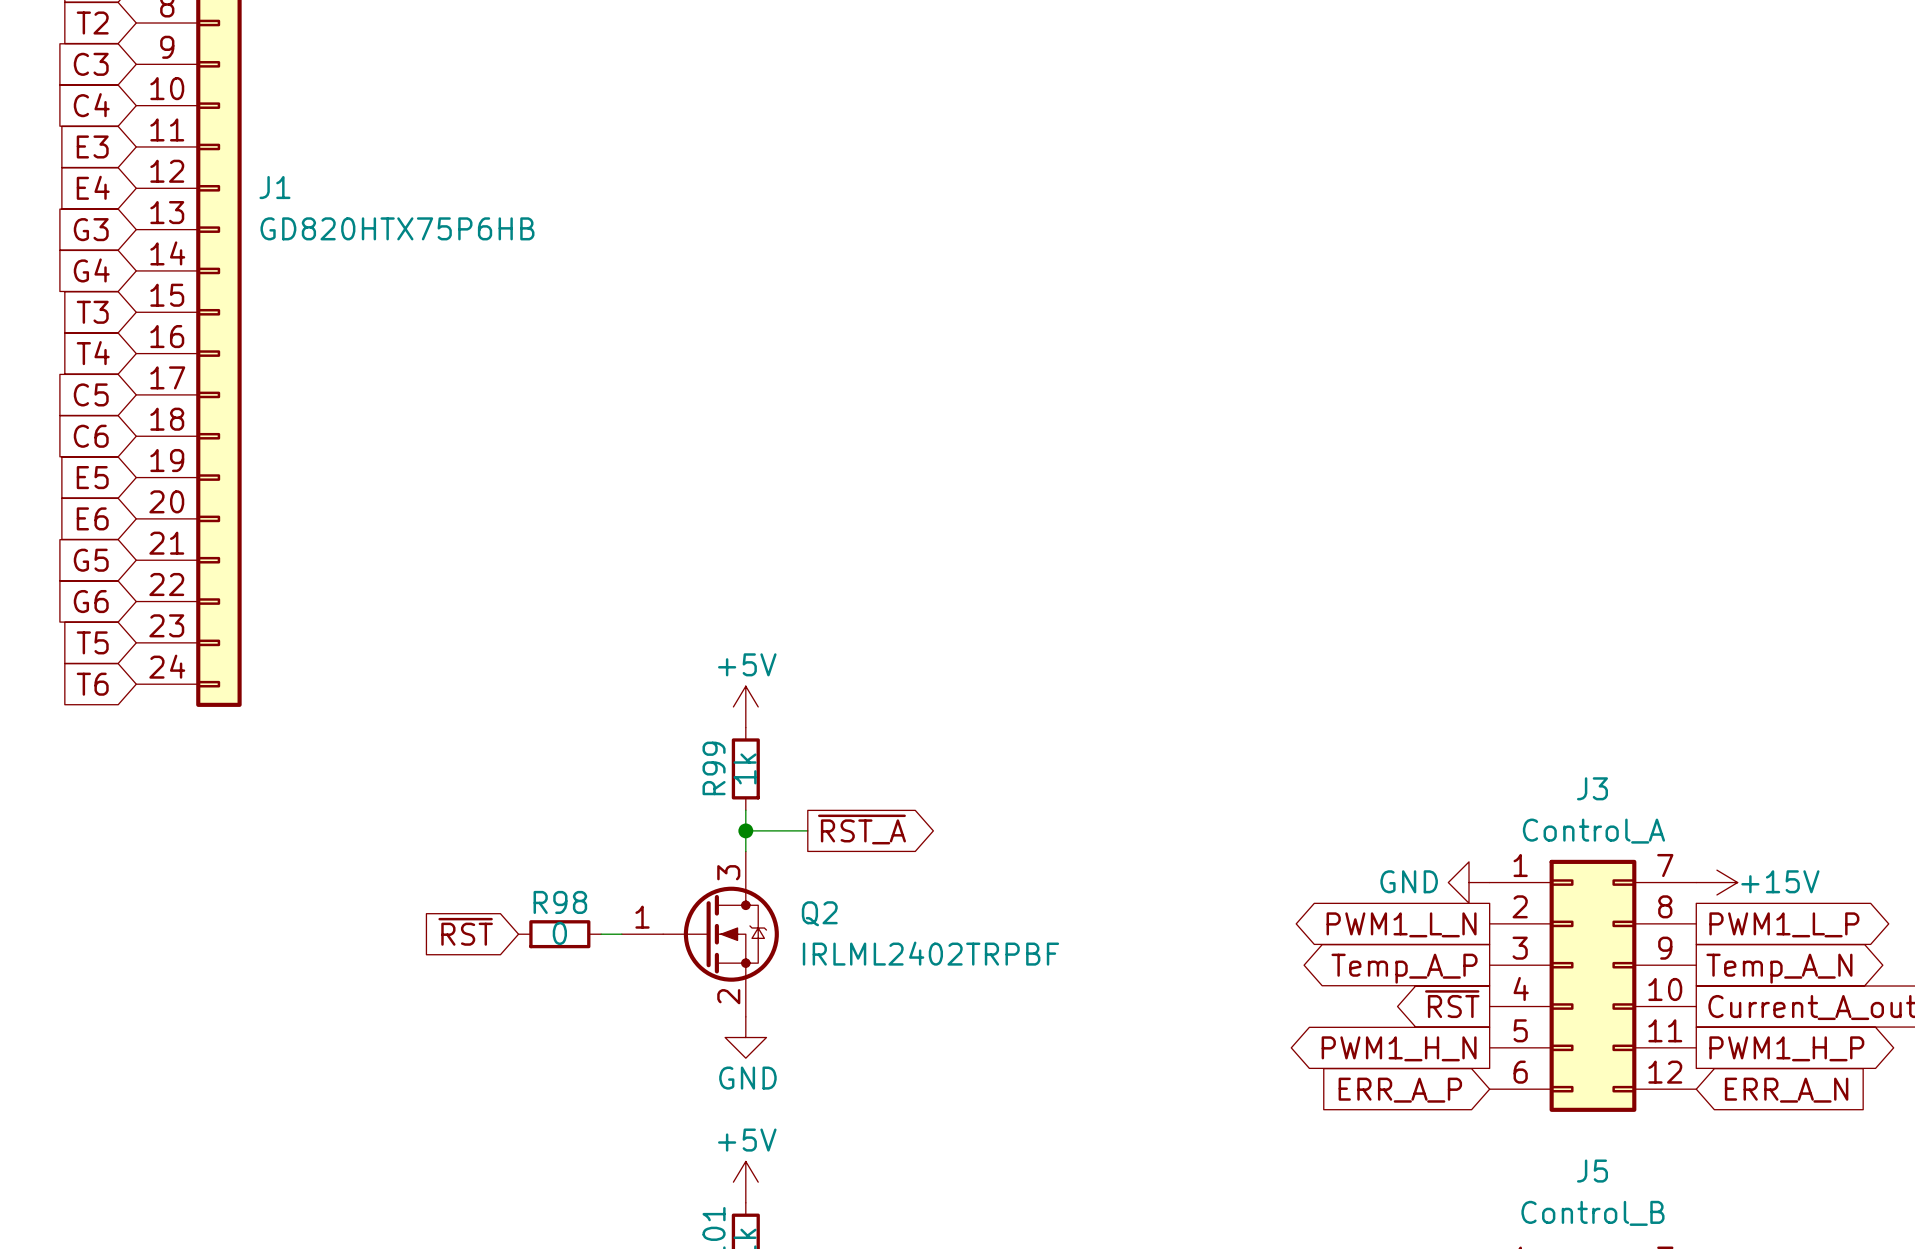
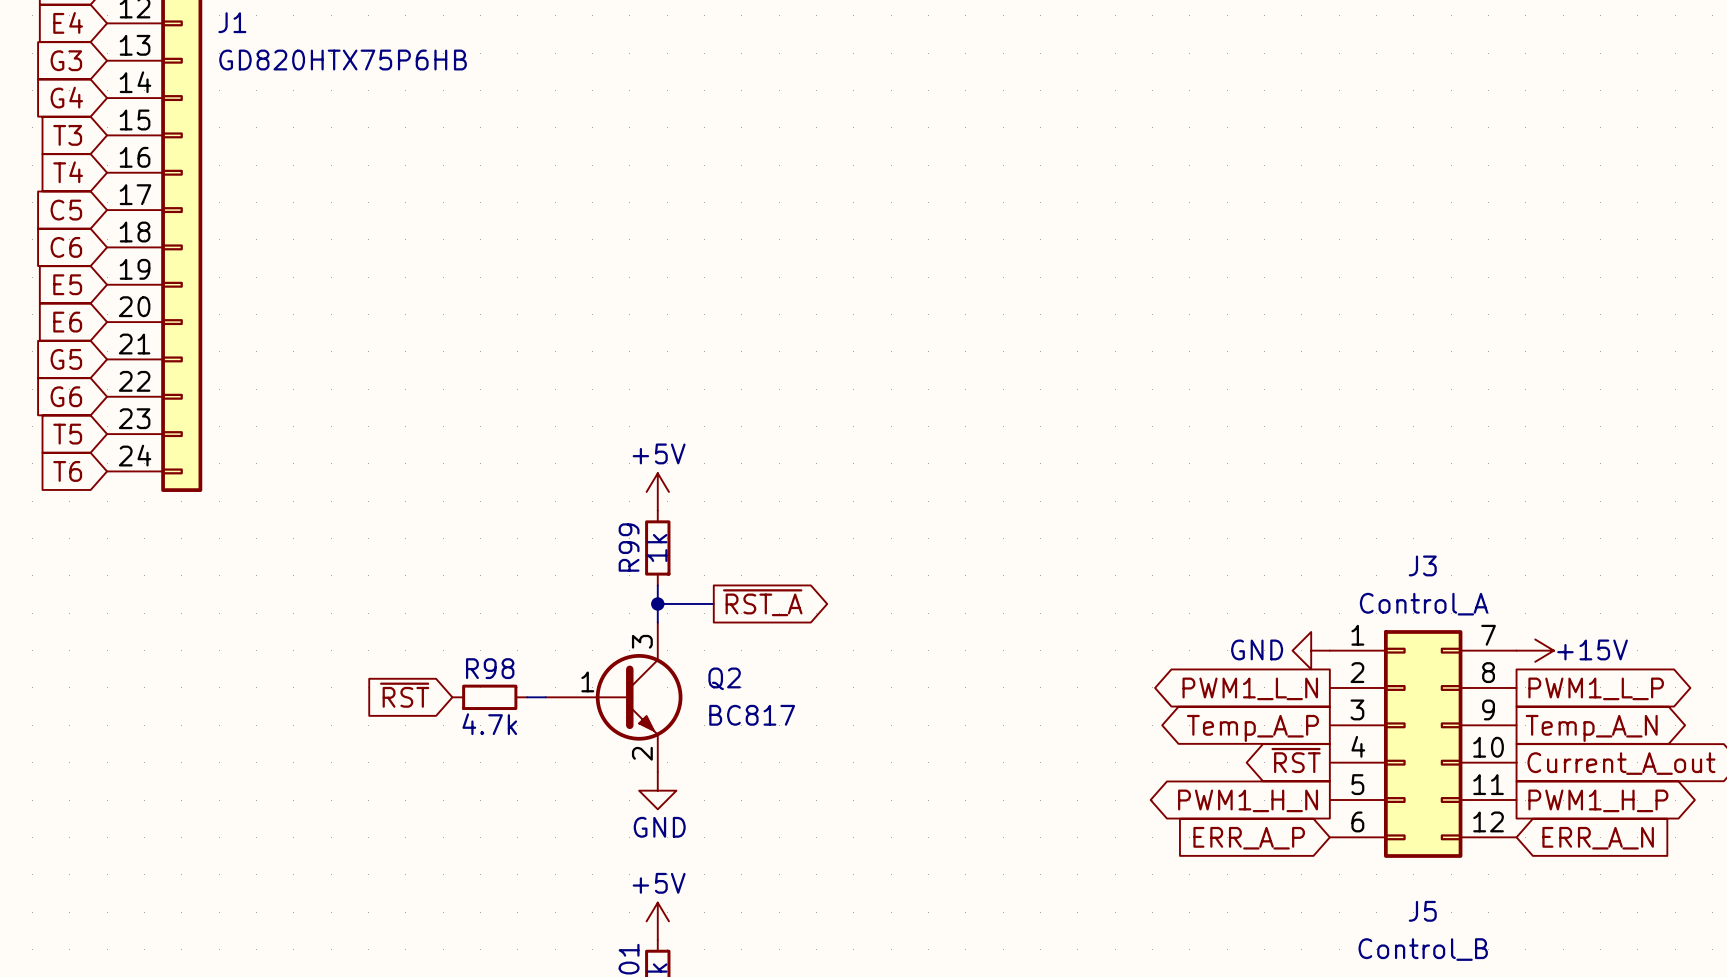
Q2 symbol: [621, 851, 779, 1017] -> [545, 622, 683, 773]
R98 value: 0 (559, 933) -> 4.7k (489, 724)
Q2 value: IRLML2402TRPBF (930, 953) -> BC817 (752, 715)

